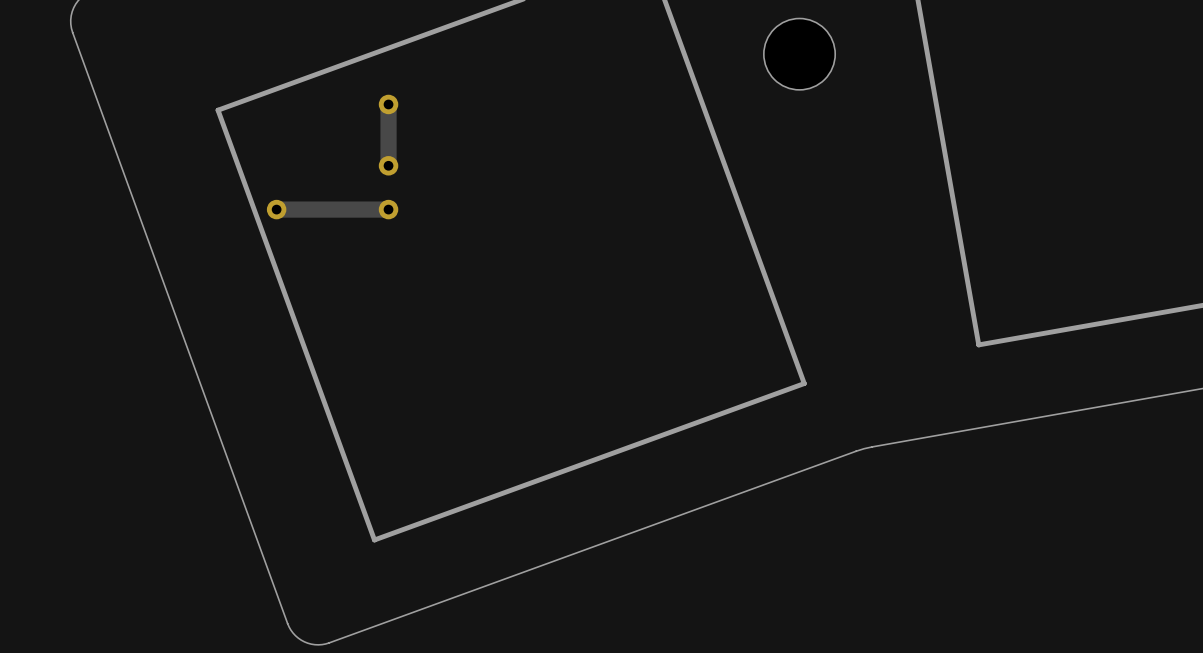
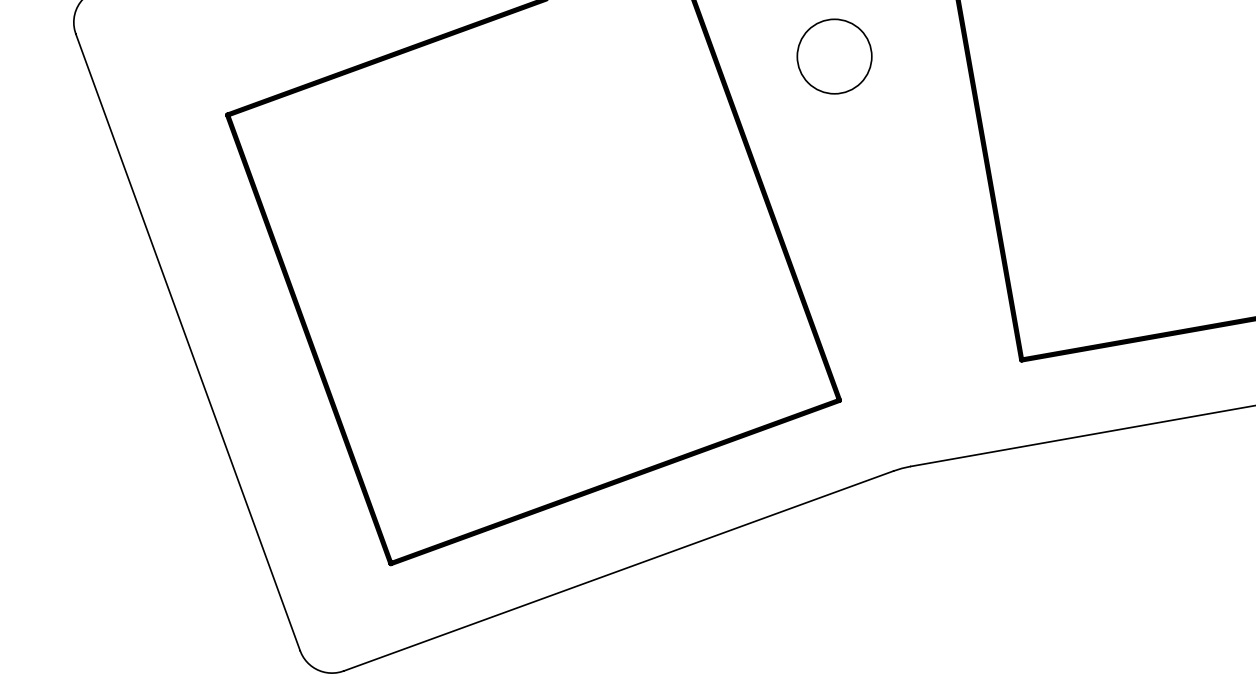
track: (388, 104) (388, 165) -> none
via: (388, 104) -> none
via: (388, 165) -> none
track: (276, 209) (388, 209) -> none
via: (276, 209) -> none
via: (388, 209) -> none

